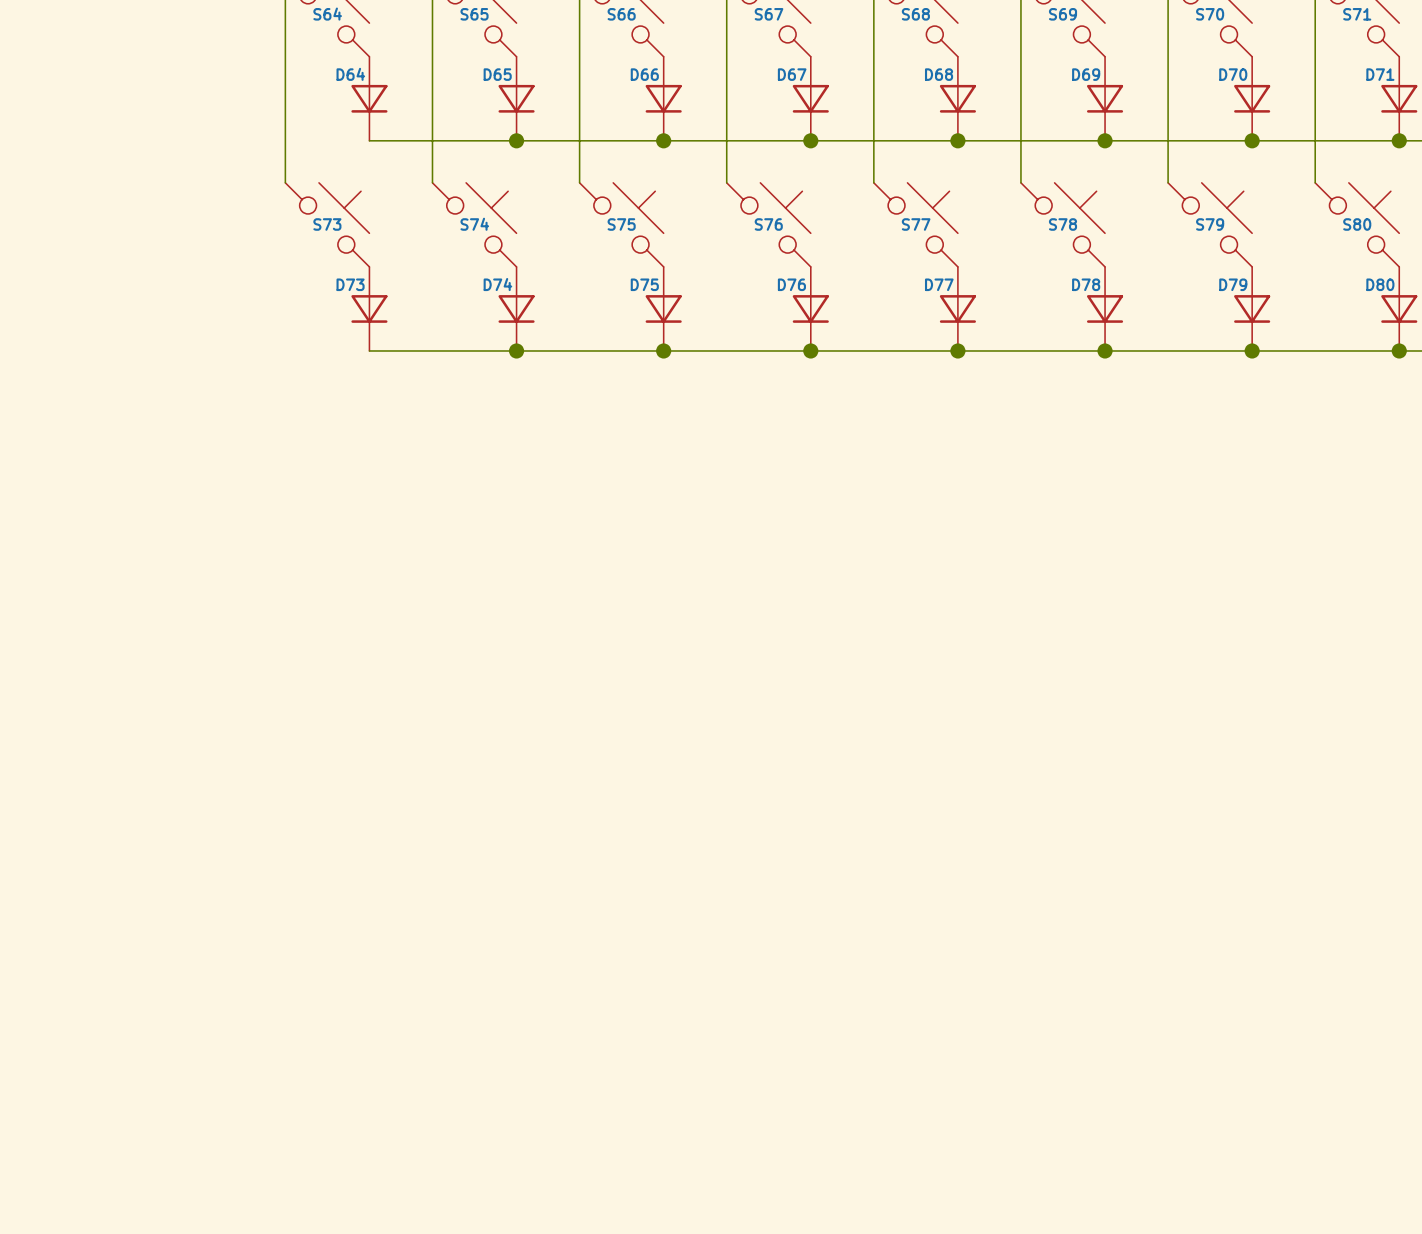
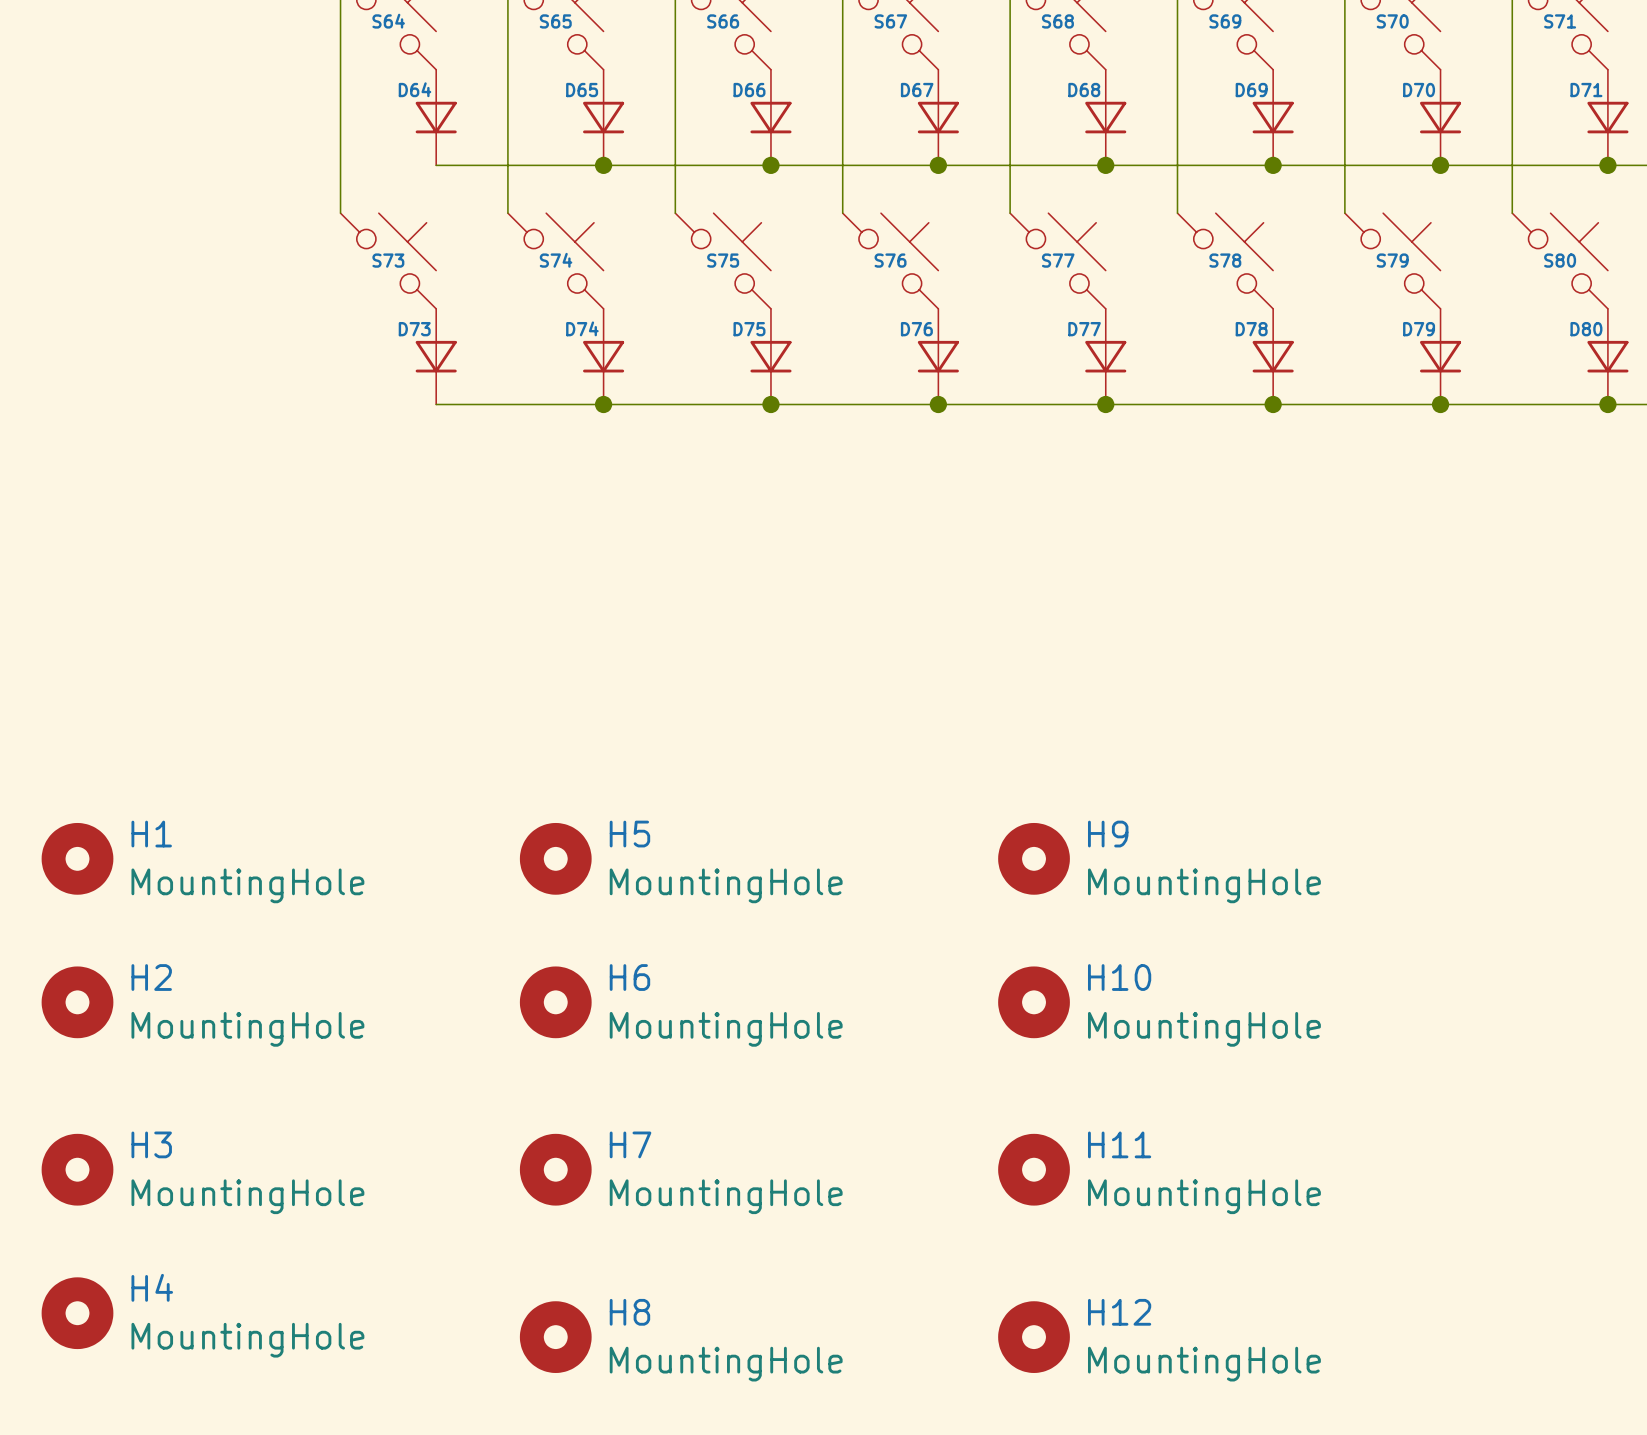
H1: none -> MountingHole (77, 858)
H5: none -> MountingHole (555, 858)
H9: none -> MountingHole (1034, 858)
H2: none -> MountingHole (77, 1002)
H6: none -> MountingHole (555, 1002)
H10: none -> MountingHole (1034, 1002)
H3: none -> MountingHole (77, 1169)
H7: none -> MountingHole (555, 1169)
H11: none -> MountingHole (1034, 1169)
H4: none -> MountingHole (77, 1313)
H8: none -> MountingHole (555, 1337)
H12: none -> MountingHole (1034, 1337)

